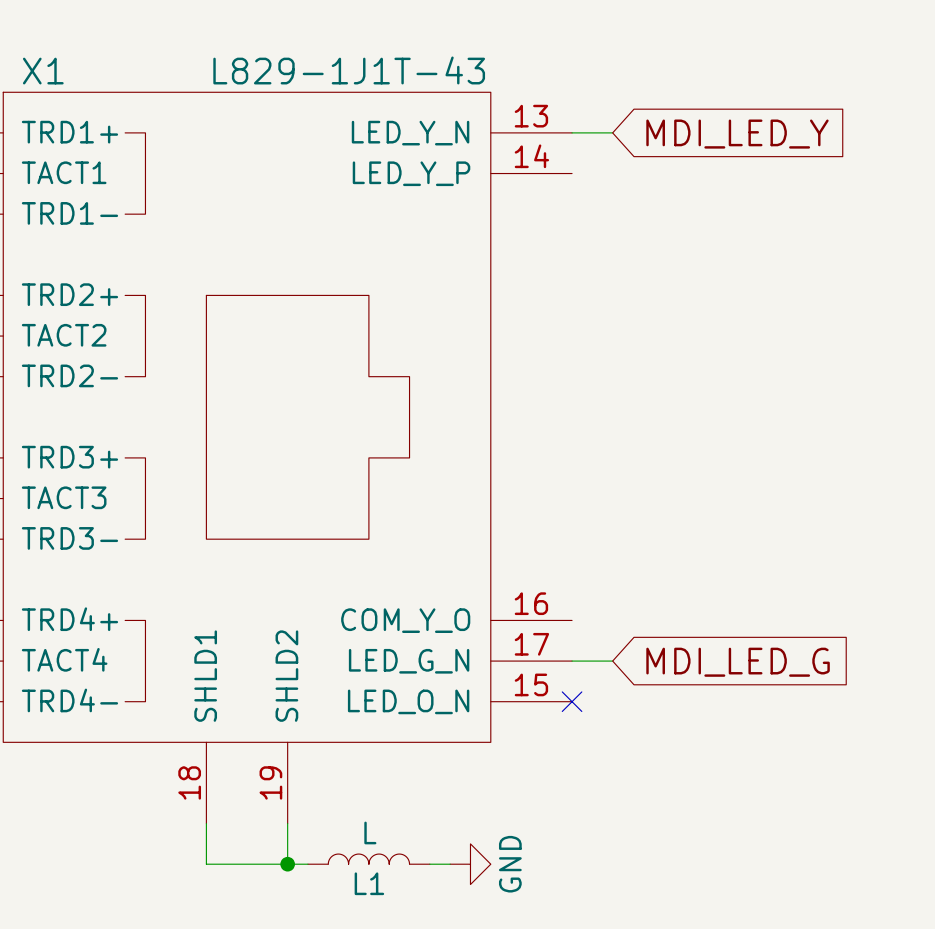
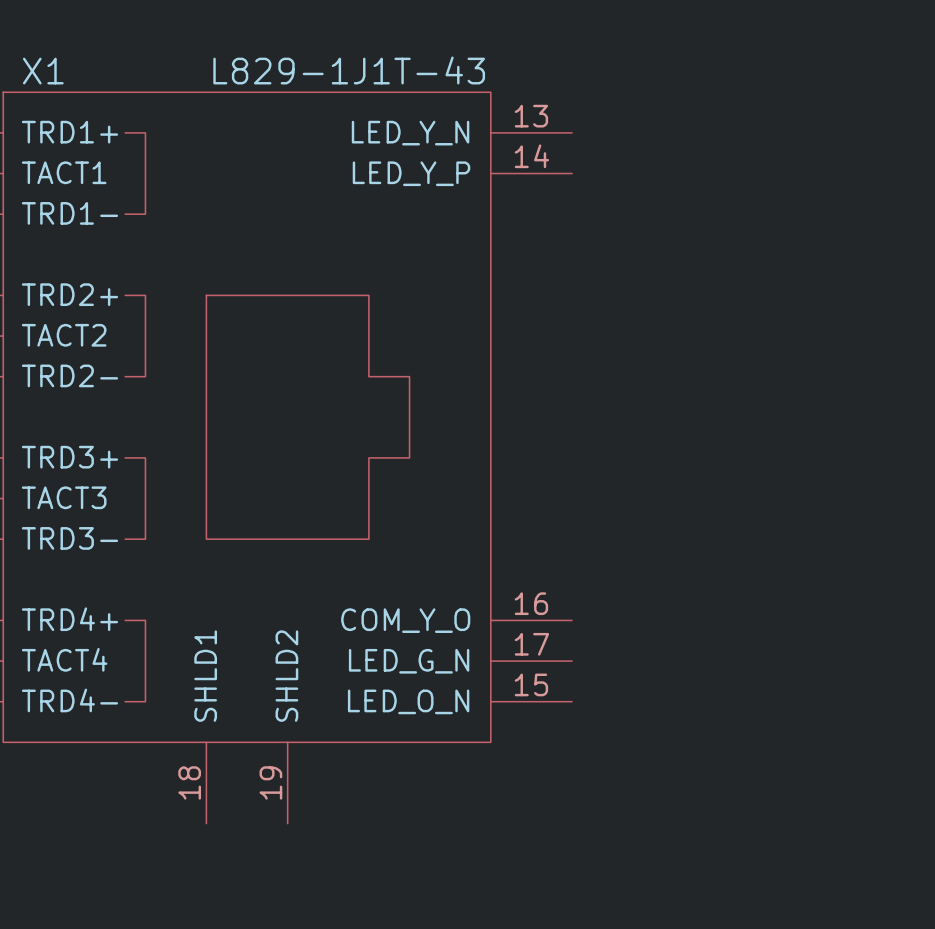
wire: (572, 132) (612, 132) -> none
global label: MDI_LED_Y (737, 134) -> none
wire: (572, 661) (612, 661) -> none
global label: MDI_LED_G (738, 662) -> none
no-connect mark: (572, 701) -> none
wire: (206, 823) (206, 864) (307, 864) -> none
wire: (287, 823) (287, 864) -> none
L1: L (368, 859) -> none
junction: (287, 864) -> none
wire: (429, 864) (450, 864) -> none
power symbol: GND (470, 864) -> none

